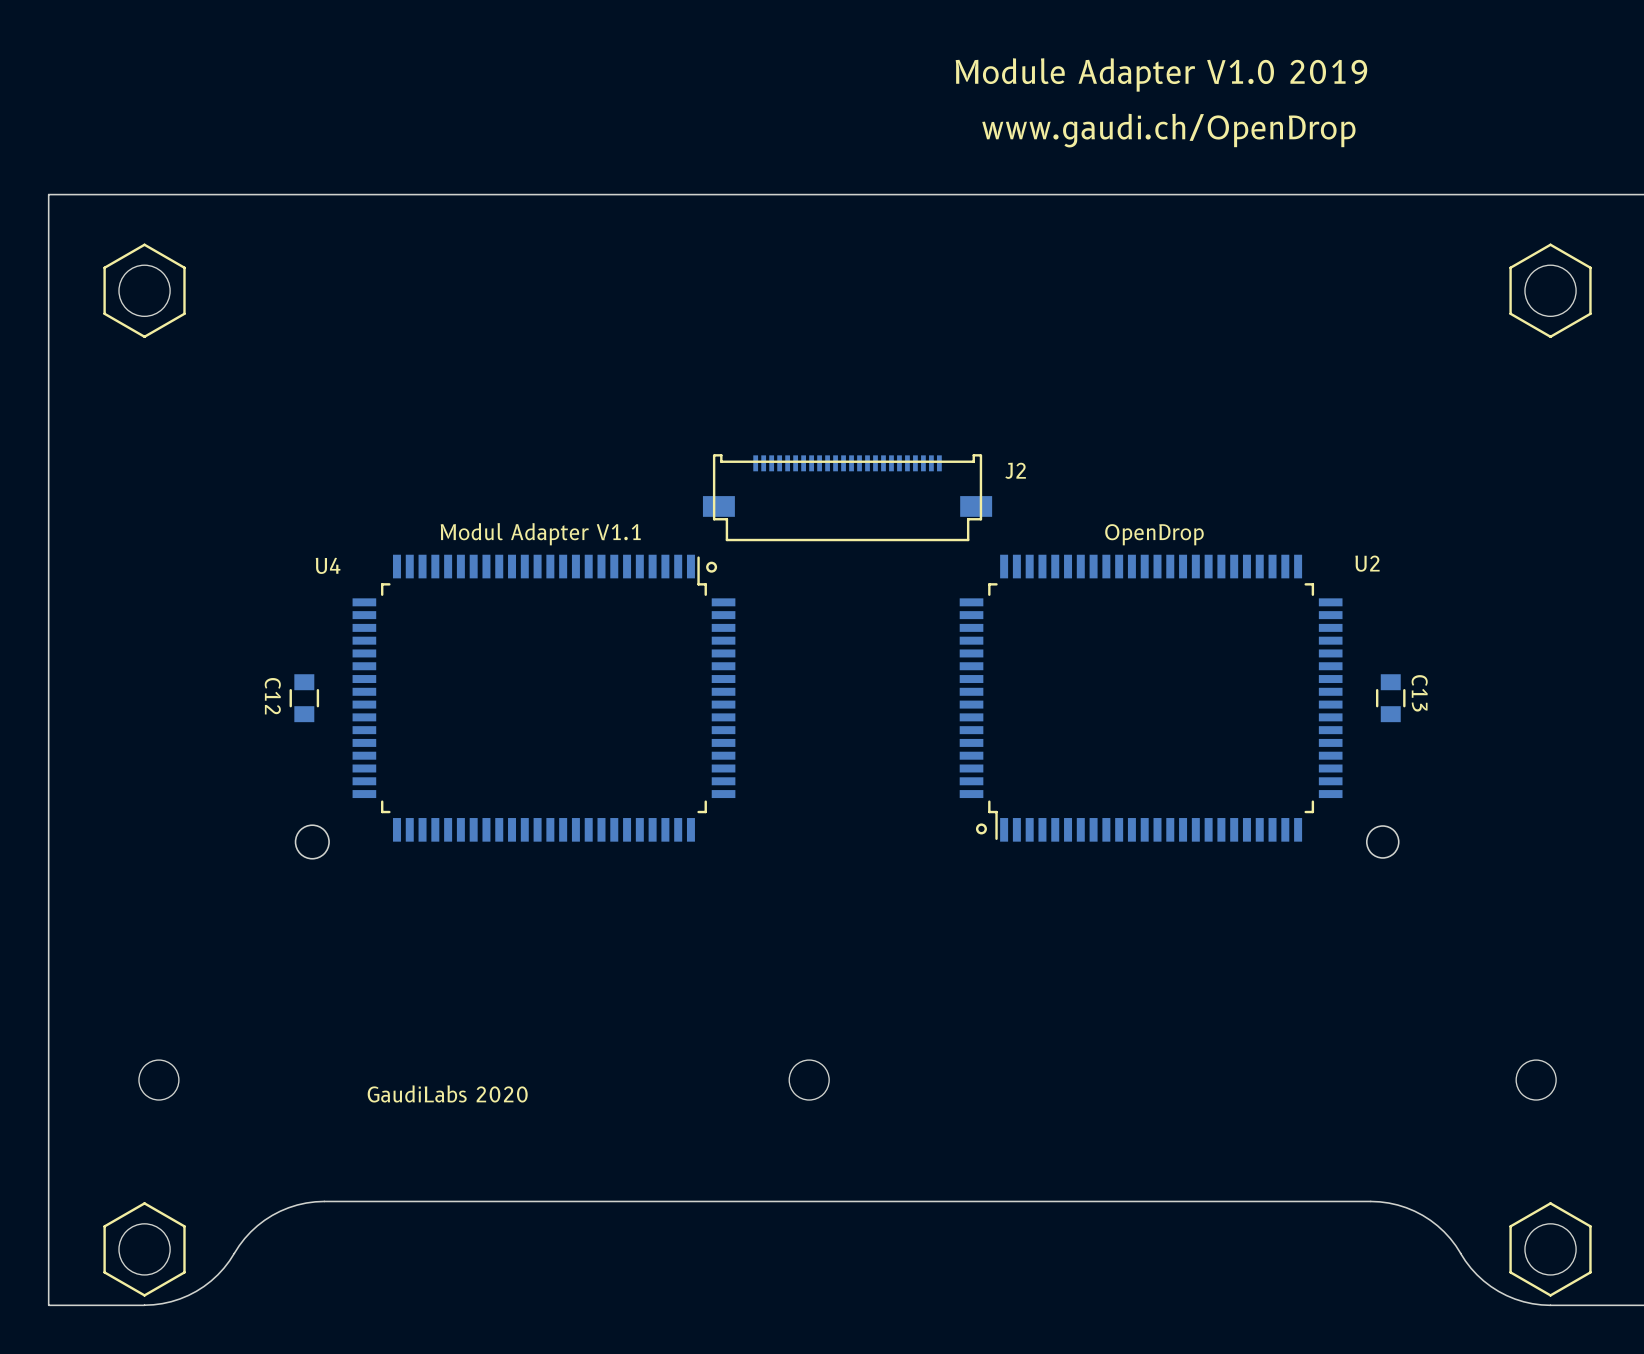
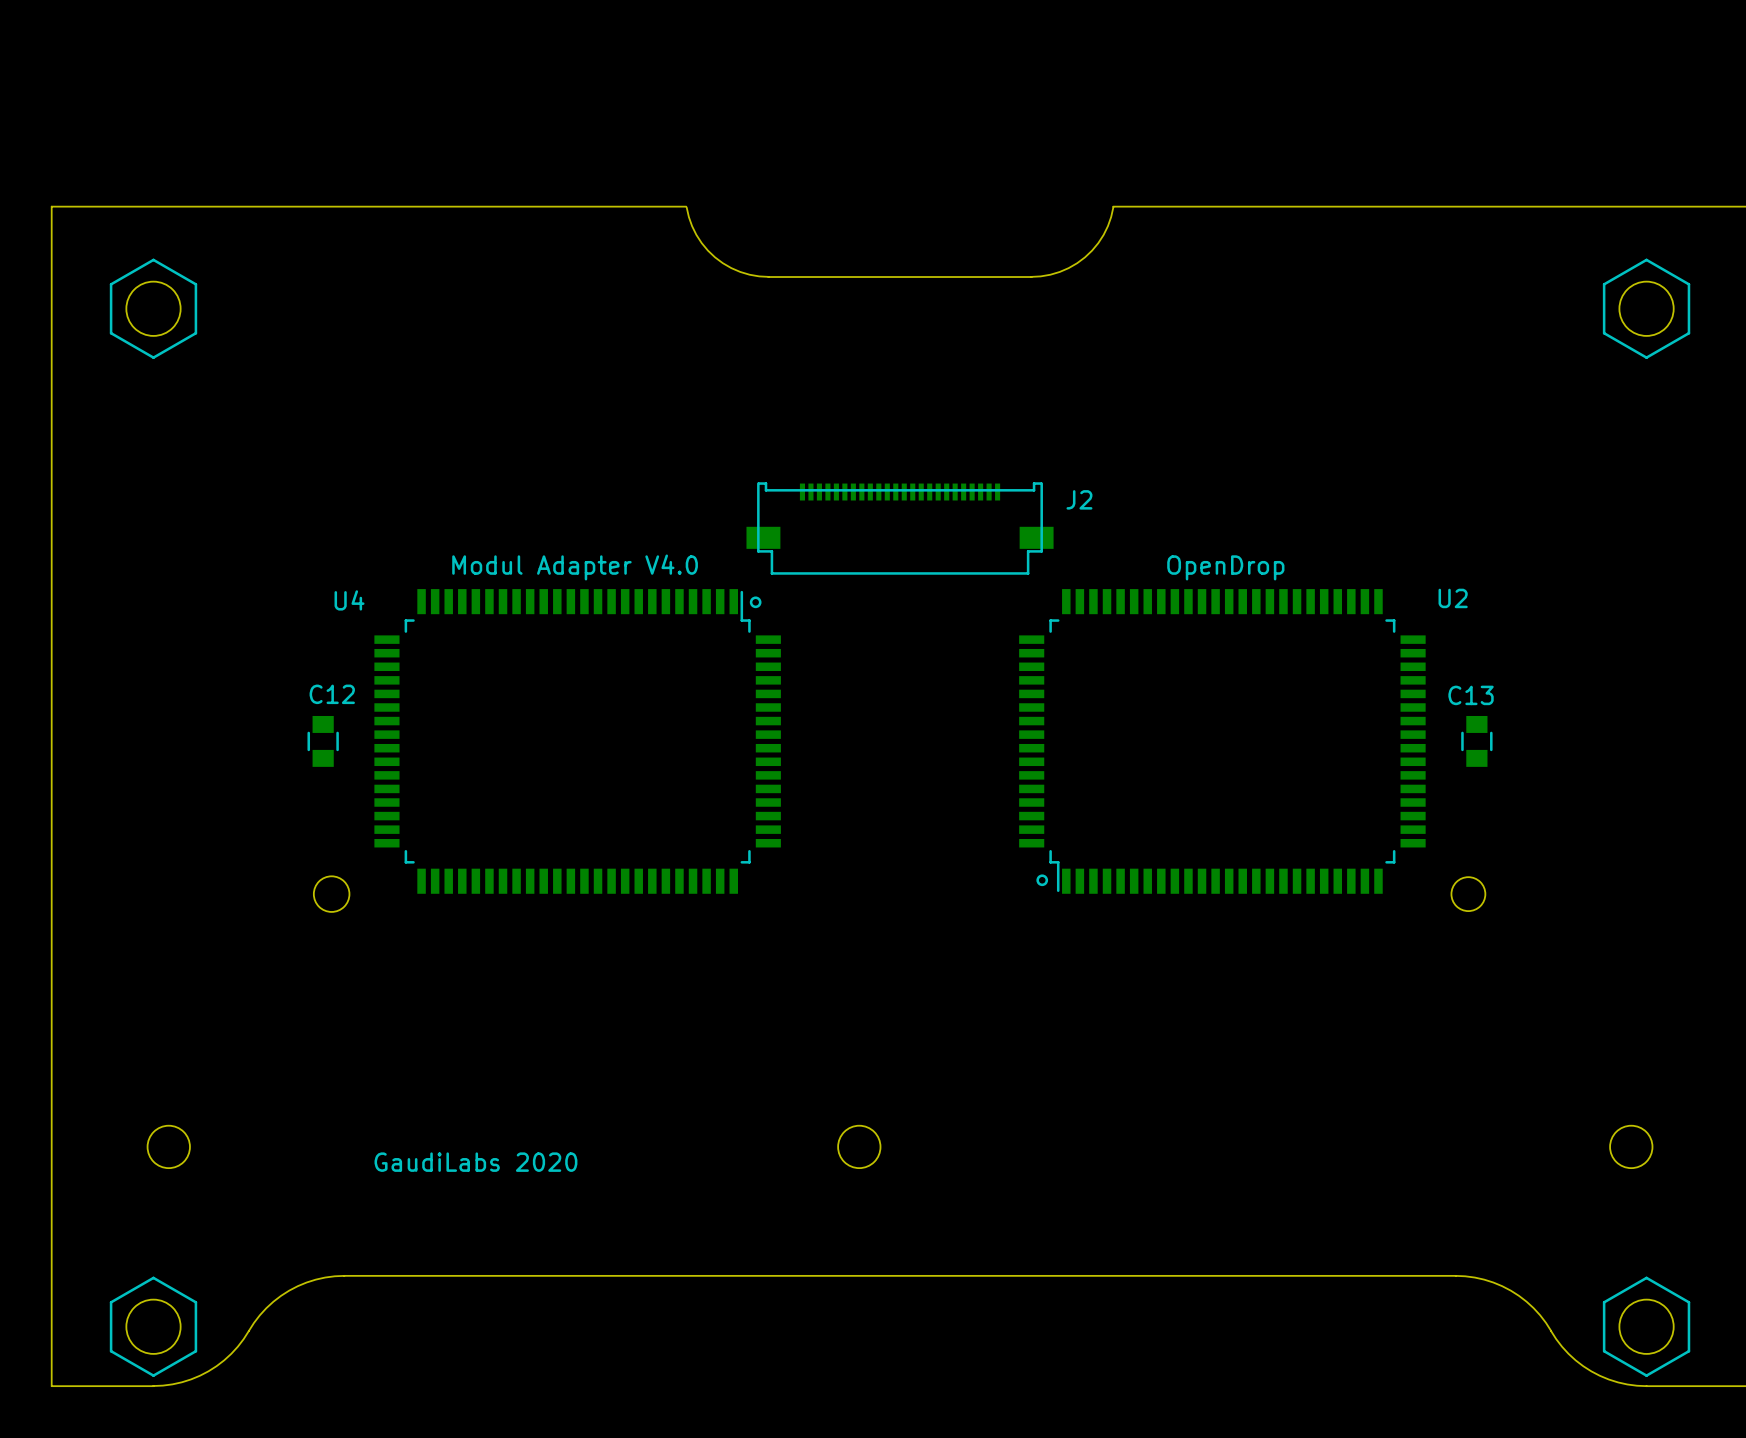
text: Module Adapter V1.0 2019 (1161, 74) -> none
text: www.gaudi.ch/OpenDrop (1168, 130) -> none
board edge: (1048, 194) (646, 194) -> none
board edge: none -> (686, 207) (696, 234) (715, 257) (740, 271) (769, 276)
board edge: none -> (1113, 207) (1103, 234) (1085, 257) (1059, 271) (1031, 276)
board edge: none -> (1031, 277) (768, 277)
text: Modul Adapter V1.1 (540, 534) -> Modul Adapter V4.0 (575, 567)
C13 name rotation: 0° (1419, 693) -> 90° counterclockwise (1471, 695)
C12 name rotation: 0° (272, 696) -> 90° counterclockwise (332, 694)
C12 name position: C12 (272, 696) -> C12 (332, 694)

